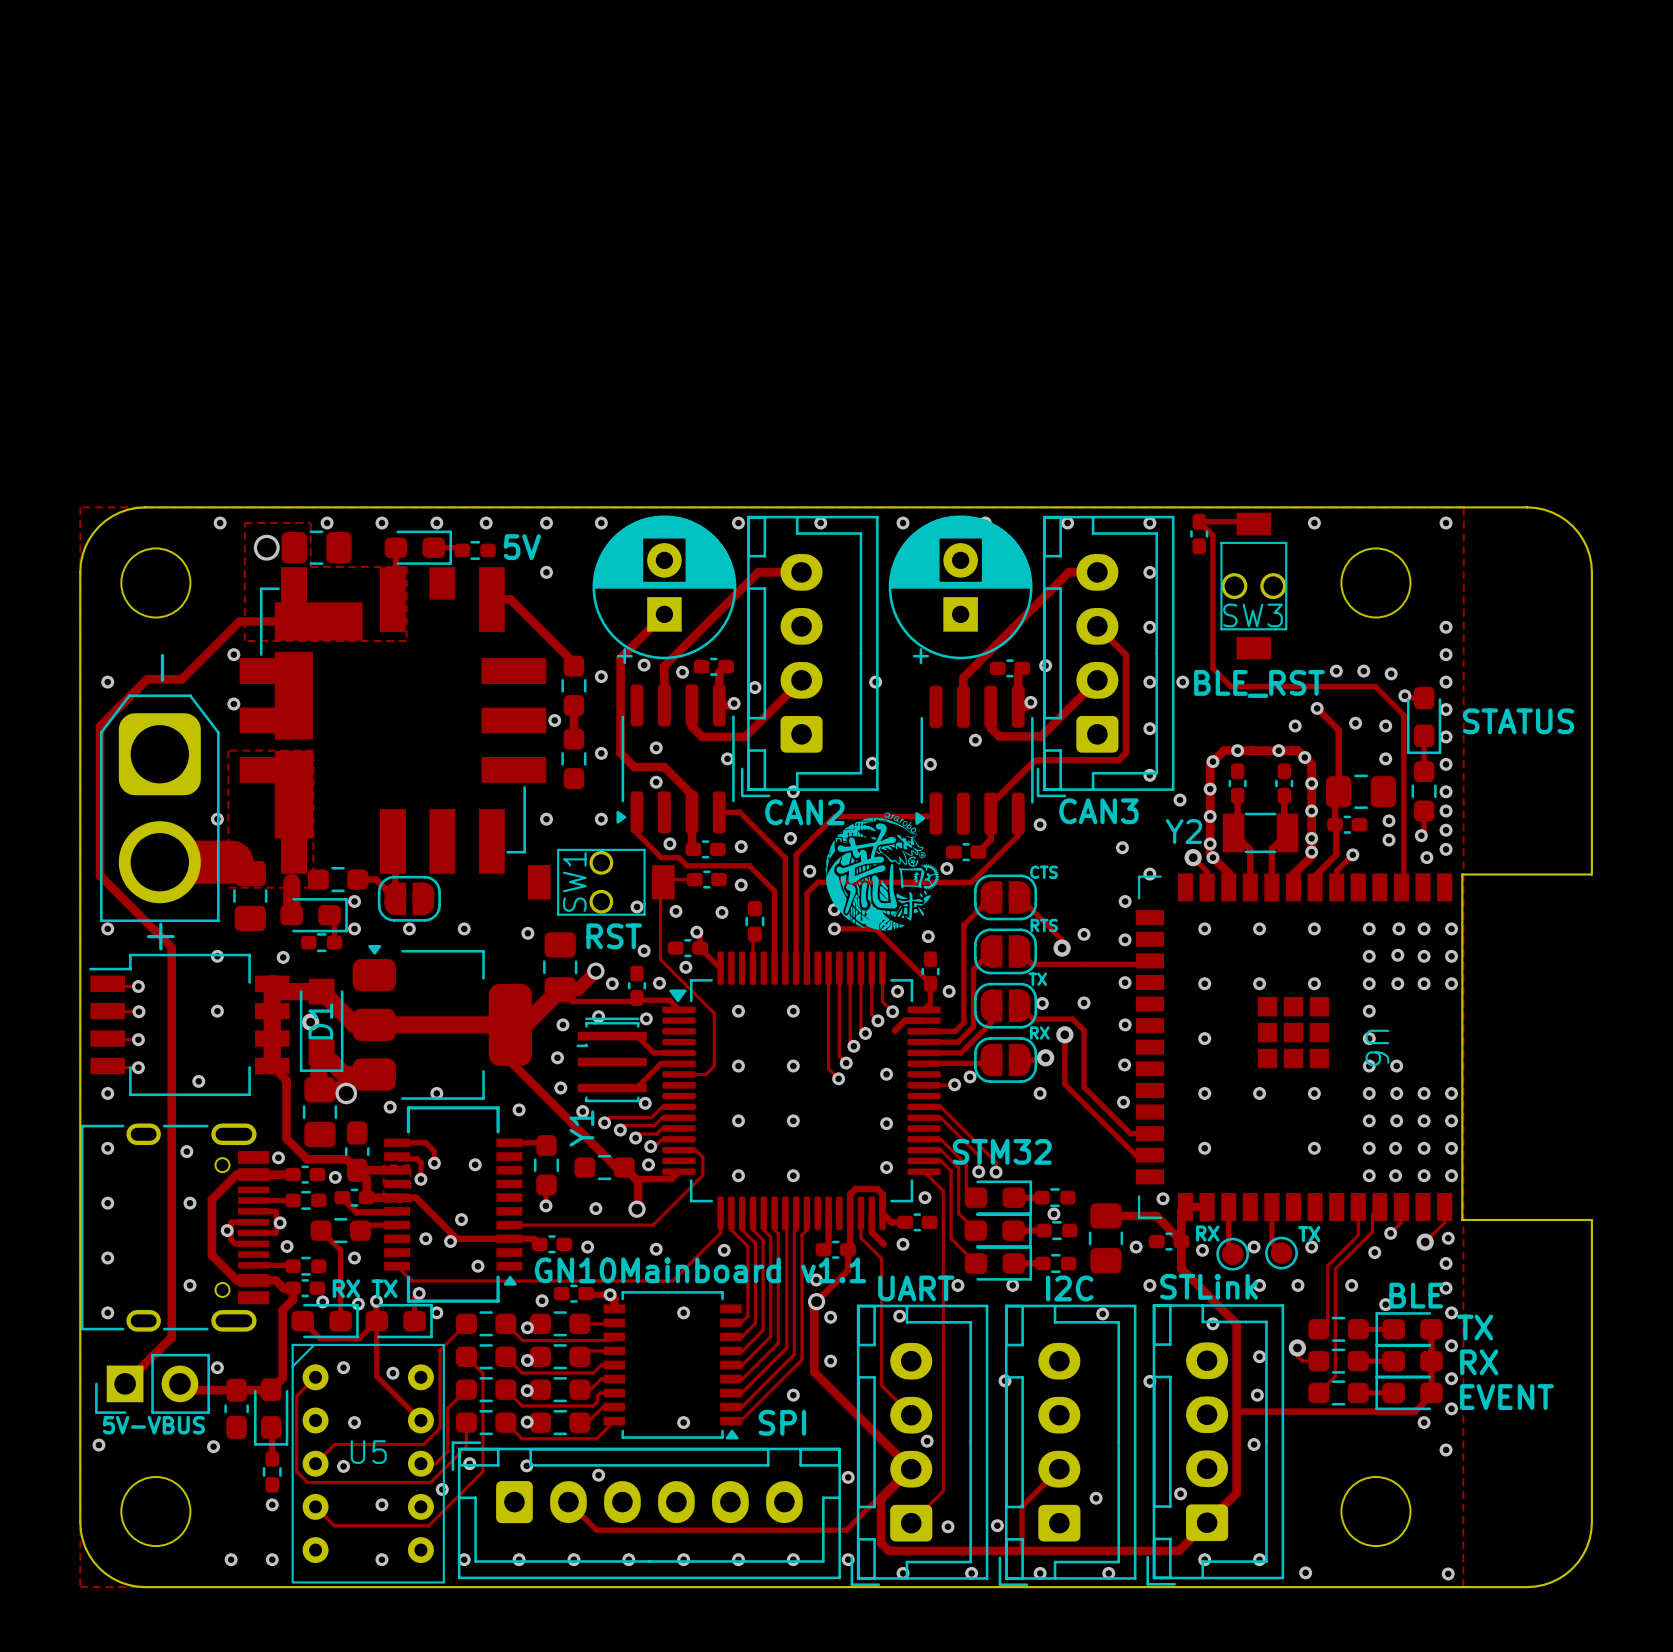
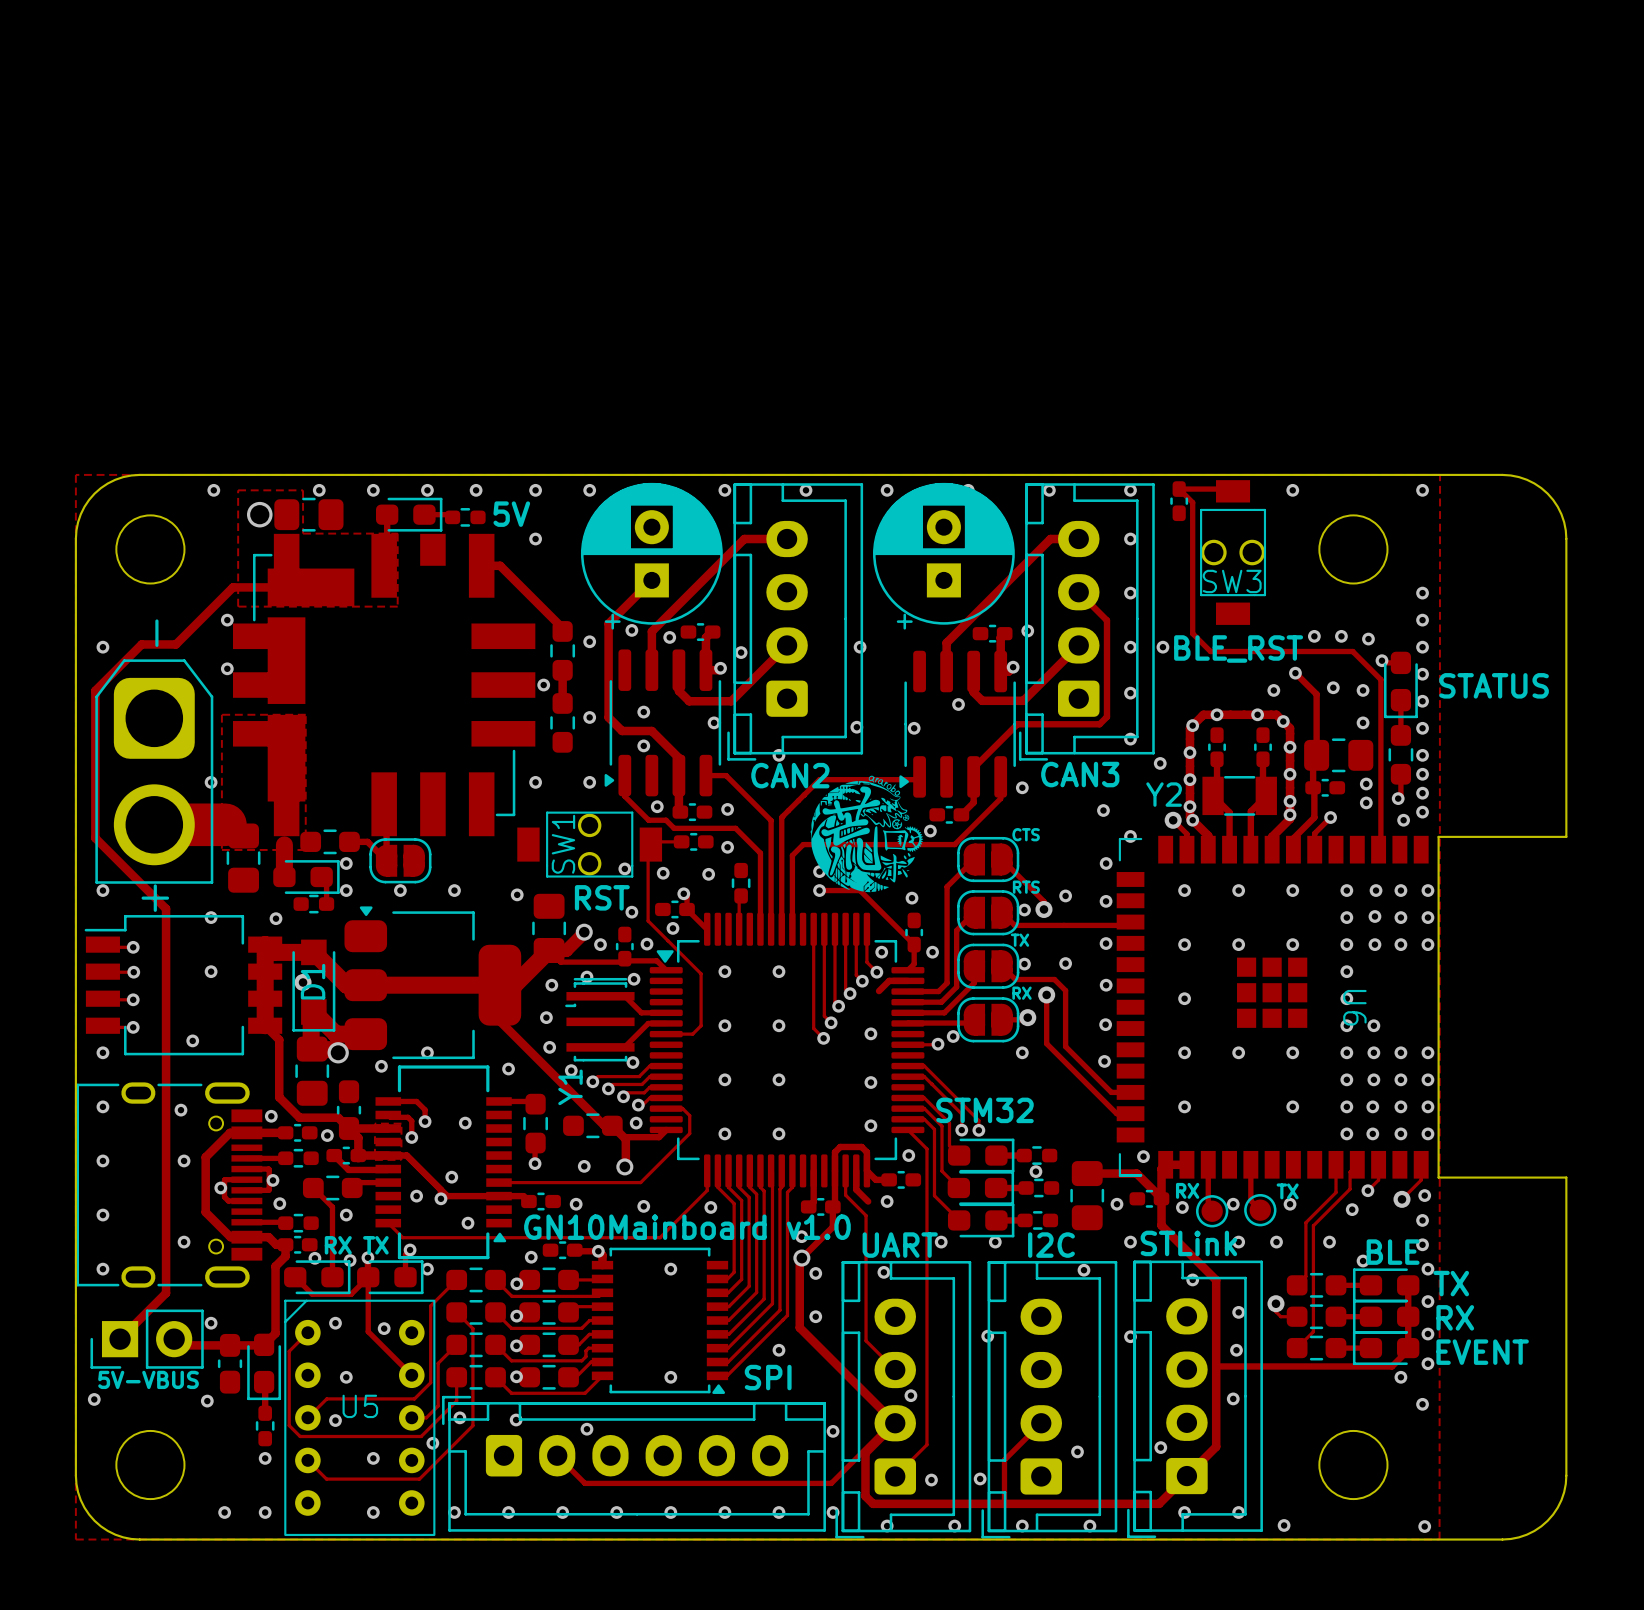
via: (790, 838) -> none
via: (809, 871) -> none
via: none -> (1024, 910)
text: GN10Mainboard v1.1 (700, 1270) -> GN10Mainboard v1.0 (687, 1227)

